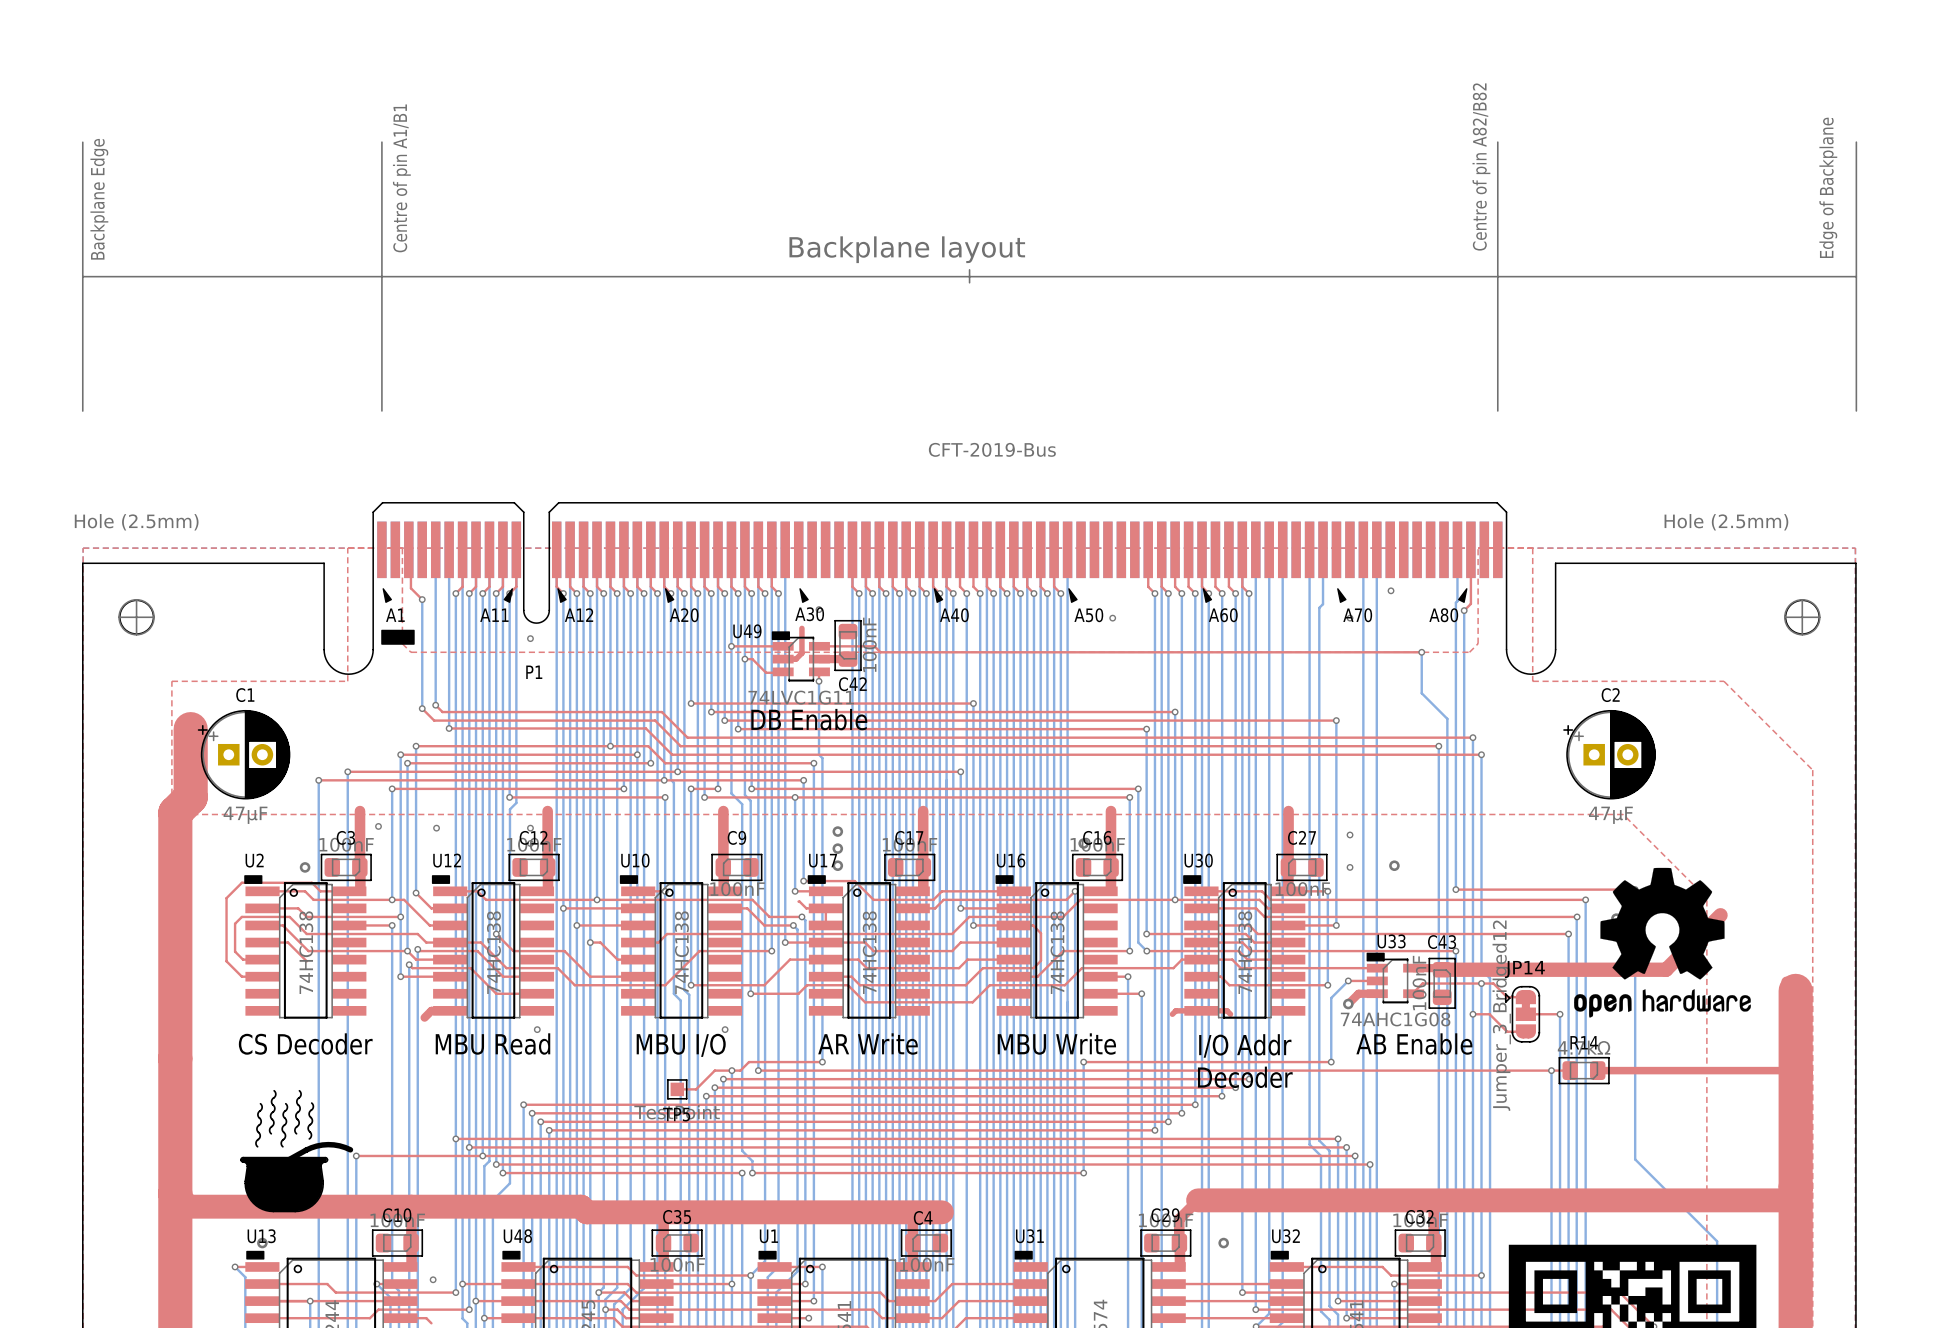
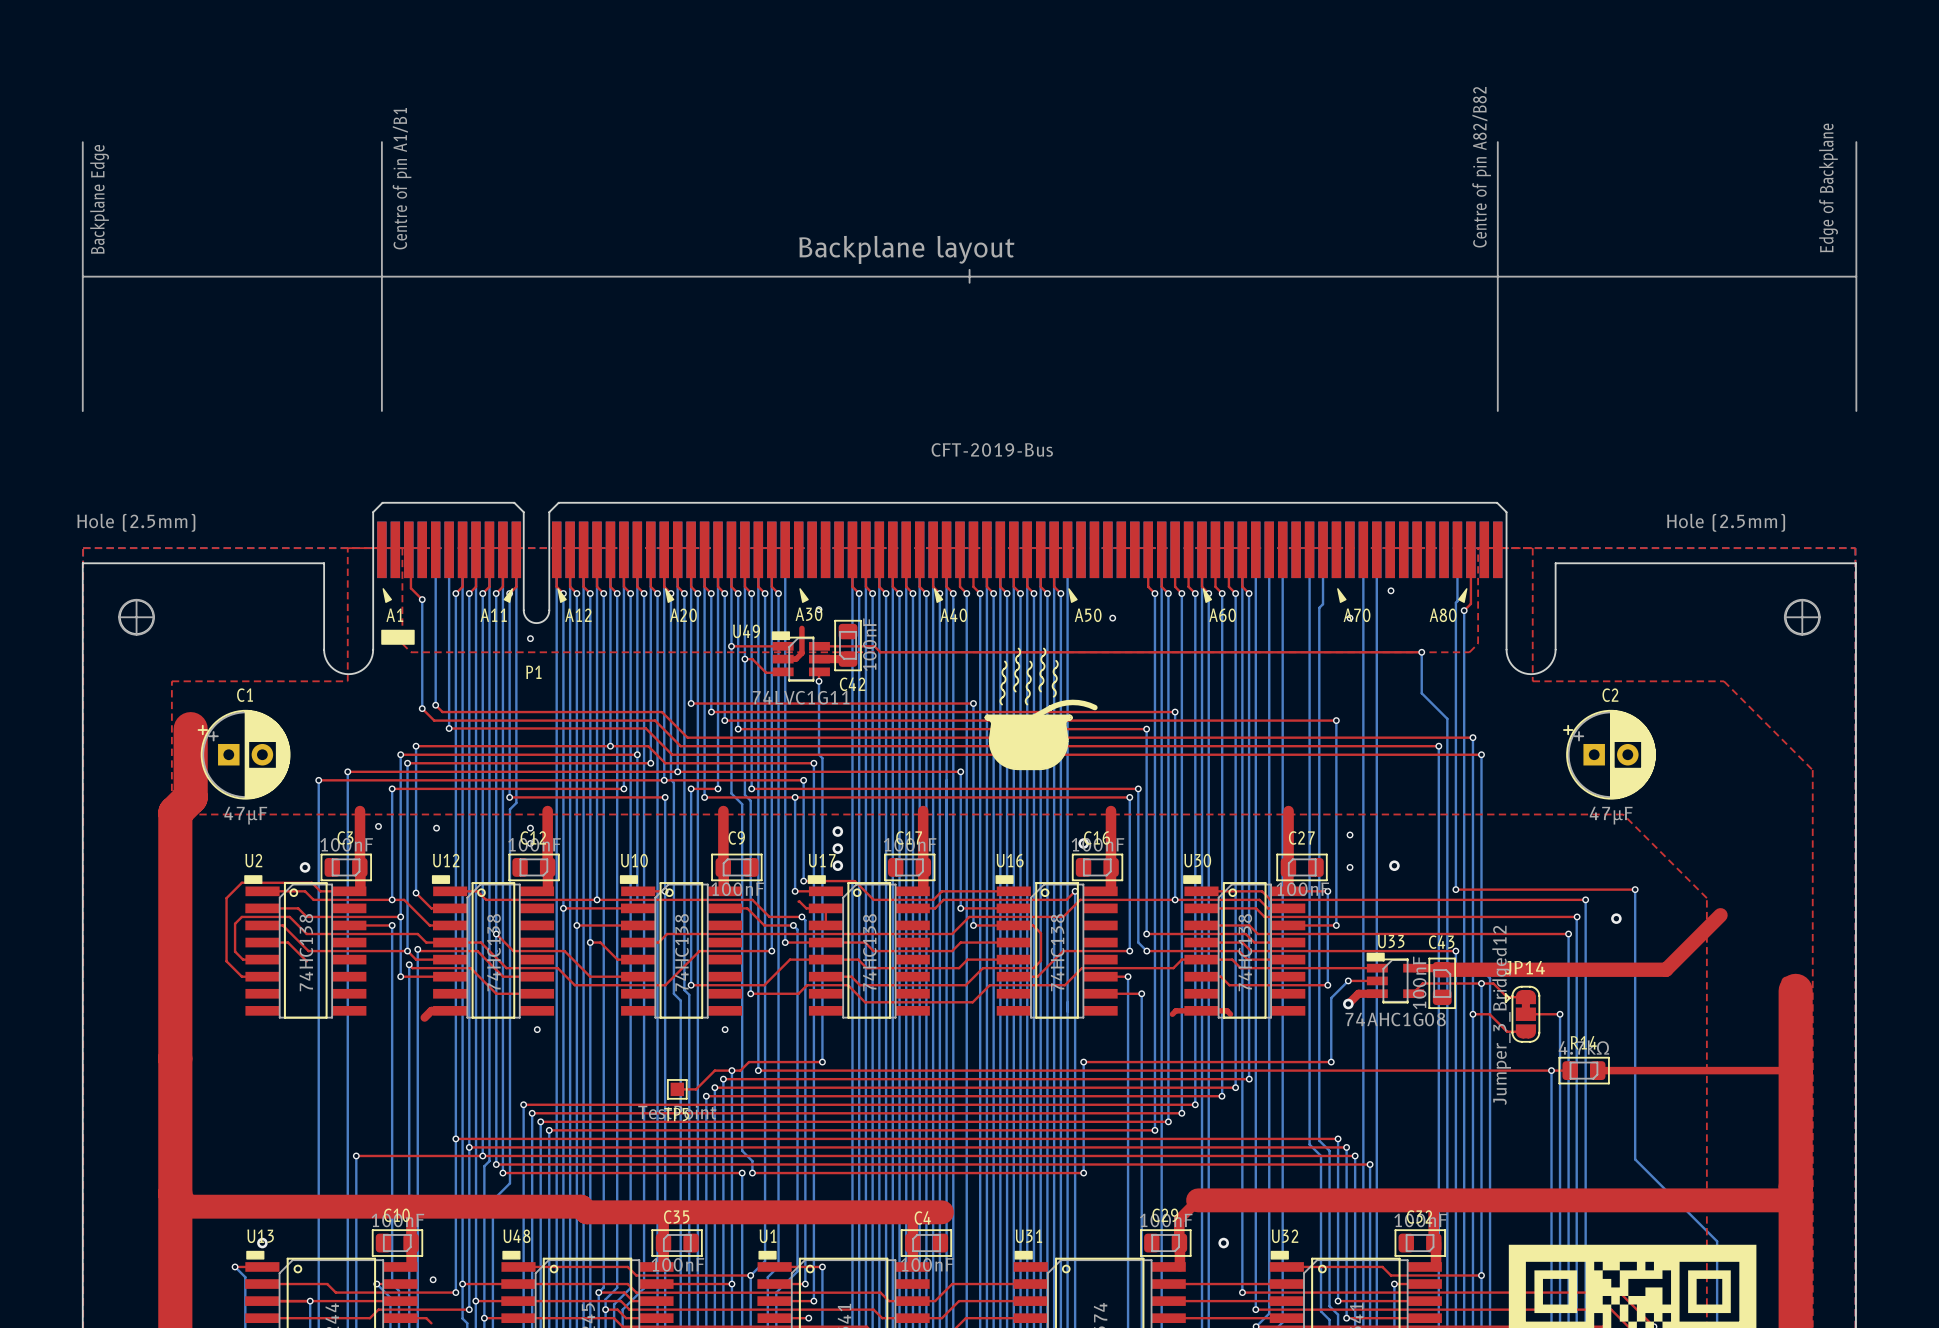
drawing: none -> [984, 647, 1098, 771]
text: DB Enable (809, 719) -> none
drawing: [1574, 867, 1751, 1018] -> none
text: CS Decoder (305, 1044) -> none
text: MBU Read (492, 1044) -> none
text: AR Write (868, 1044) -> none
text: MBU Write (1056, 1044) -> none
text: AB Enable (1414, 1044) -> none
text: MBU I/O (681, 1045) -> none
text: I/O Addr (1245, 1045) -> none
text: Decoder (1245, 1077) -> none
drawing: [240, 1089, 354, 1213] -> none

